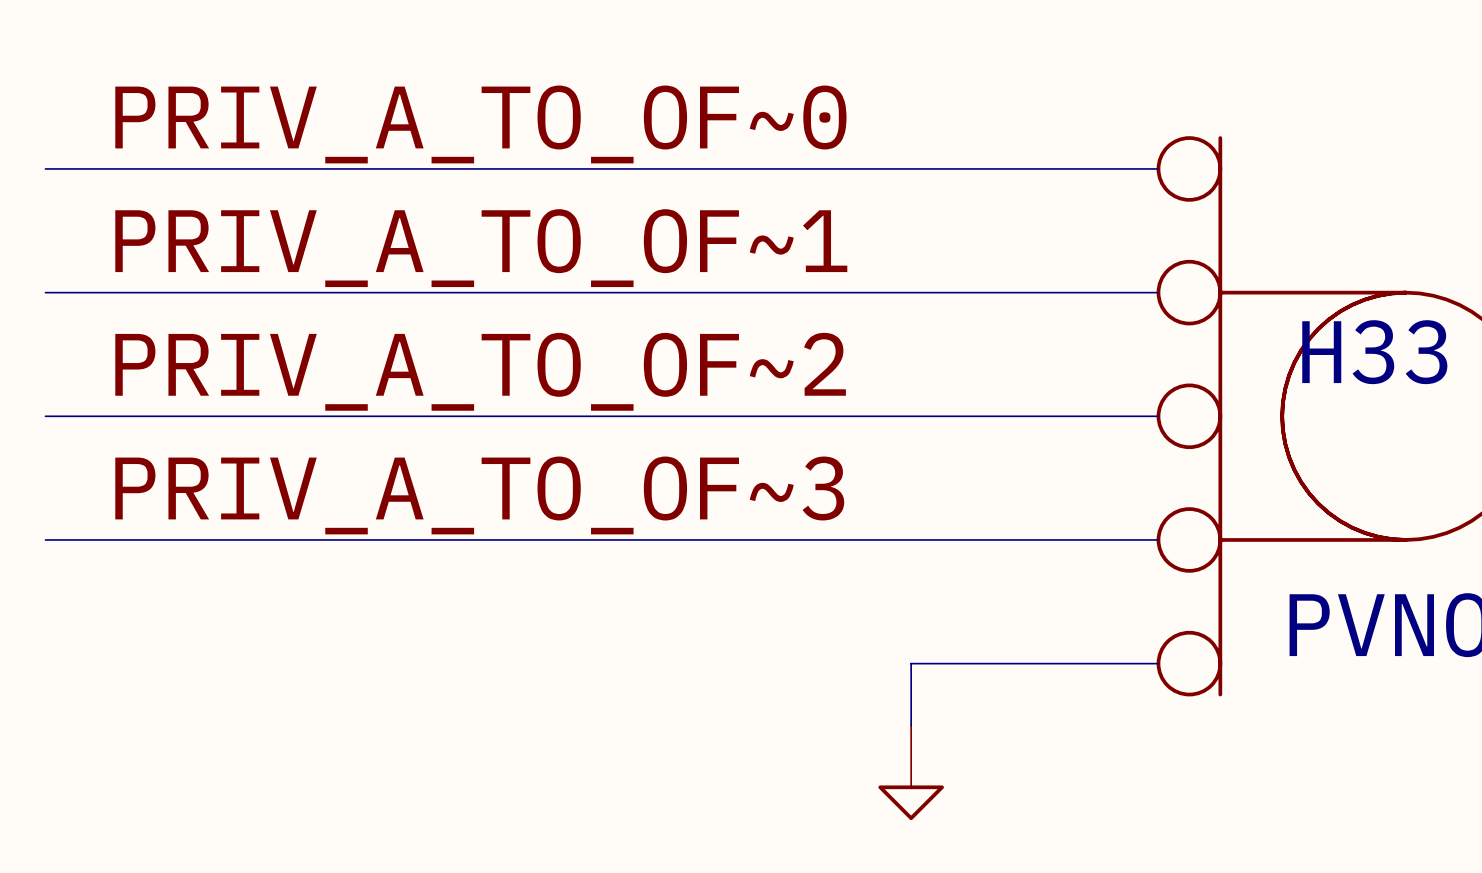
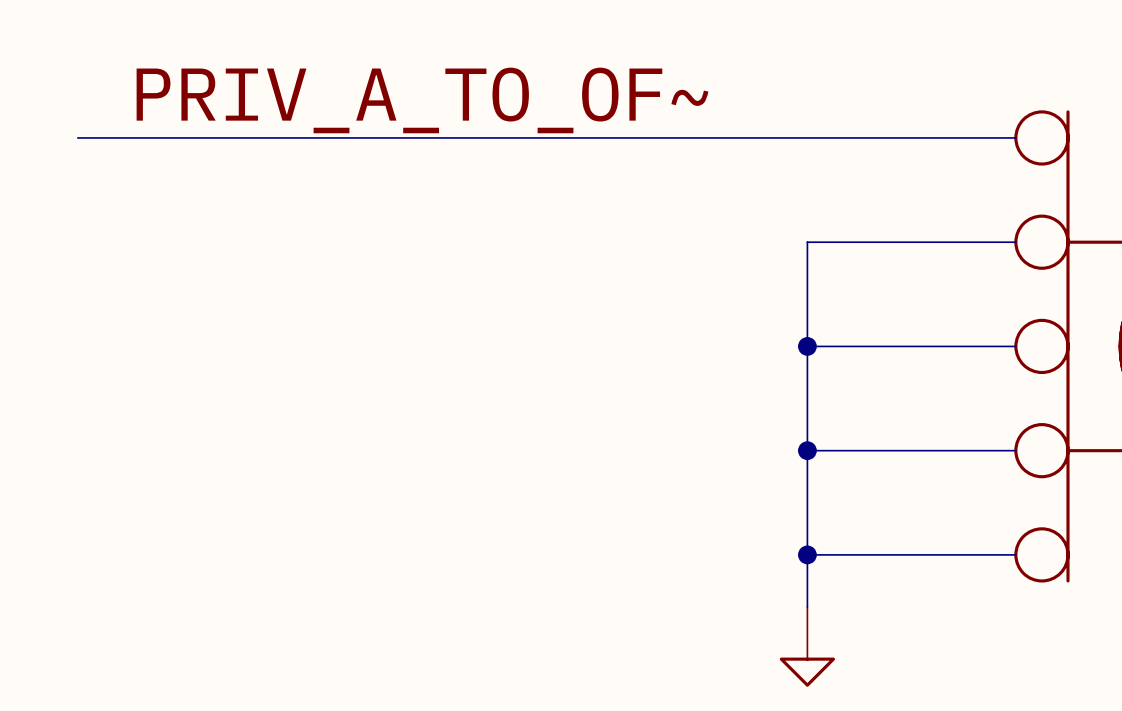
label: PRIV_A_TO_OF~0 (480, 124) -> PRIV_A_TO_OF~ (422, 100)
label: PRIV_A_TO_OF~1 (481, 248) -> none
wire: (45, 292) (911, 292) -> (807, 554) (807, 242)
label: PRIV_A_TO_OF~2 (480, 371) -> none
wire: (45, 416) (911, 416) -> none
junction: none -> (807, 346)
label: PRIV_A_TO_OF~3 (479, 495) -> none
wire: (45, 539) (911, 539) -> none
junction: none -> (807, 450)
junction: none -> (807, 554)

